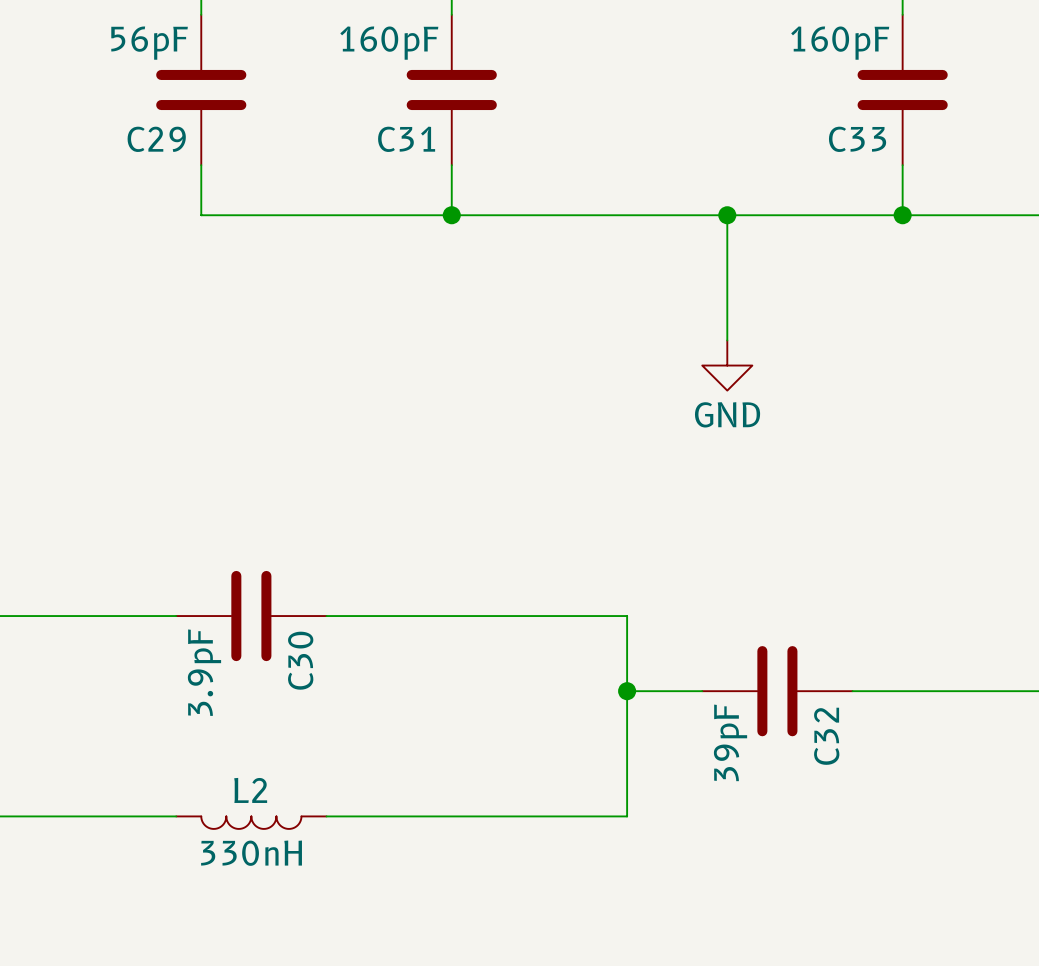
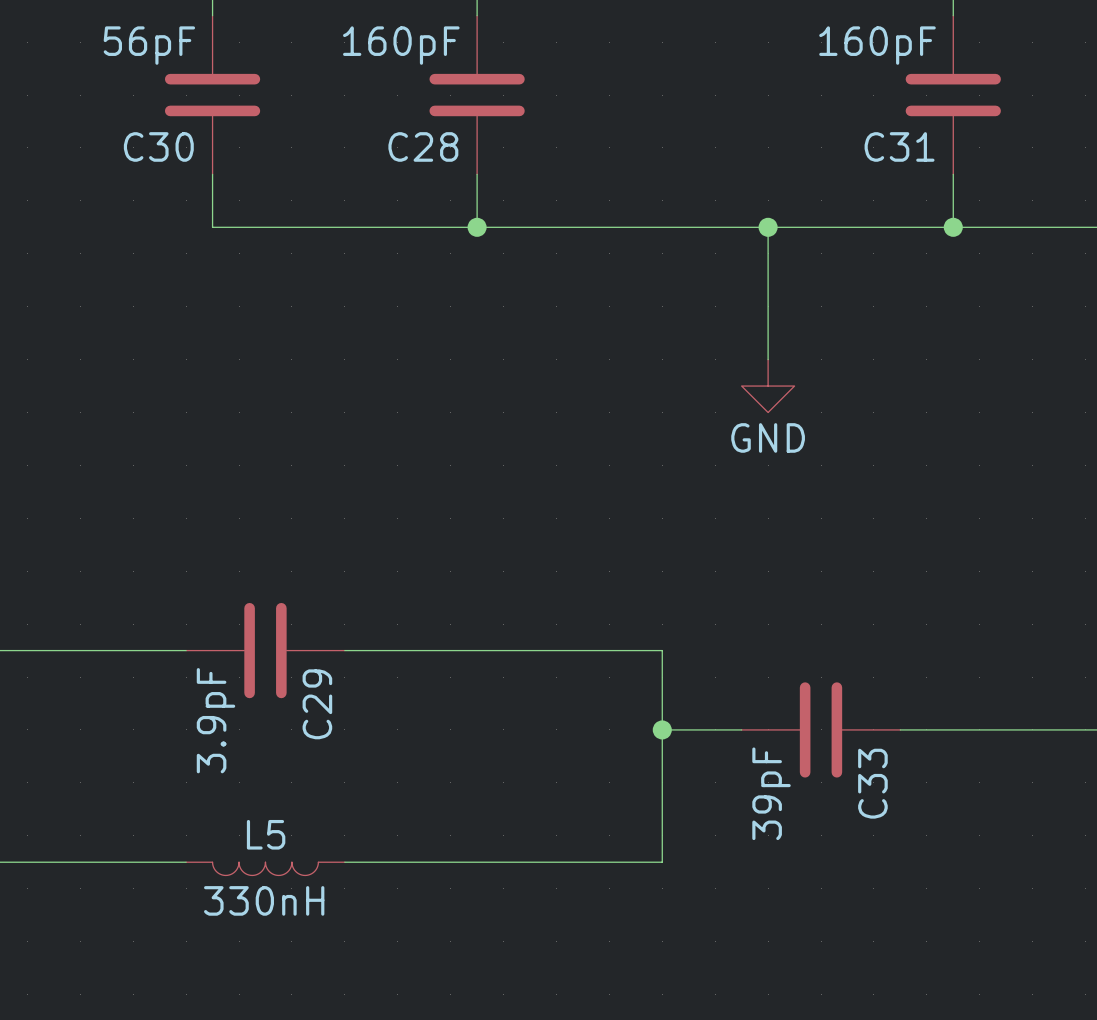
C29 name: C29 (156, 139) -> C30 (158, 146)
C31 name: C31 (406, 139) -> C28 (423, 146)
C33 name: C33 (857, 139) -> C31 (899, 146)
C30 name: C30 (300, 660) -> C29 (317, 704)
C32 name: C32 (826, 736) -> C33 (872, 783)
L2 name: L2 (250, 790) -> L5 (266, 834)

